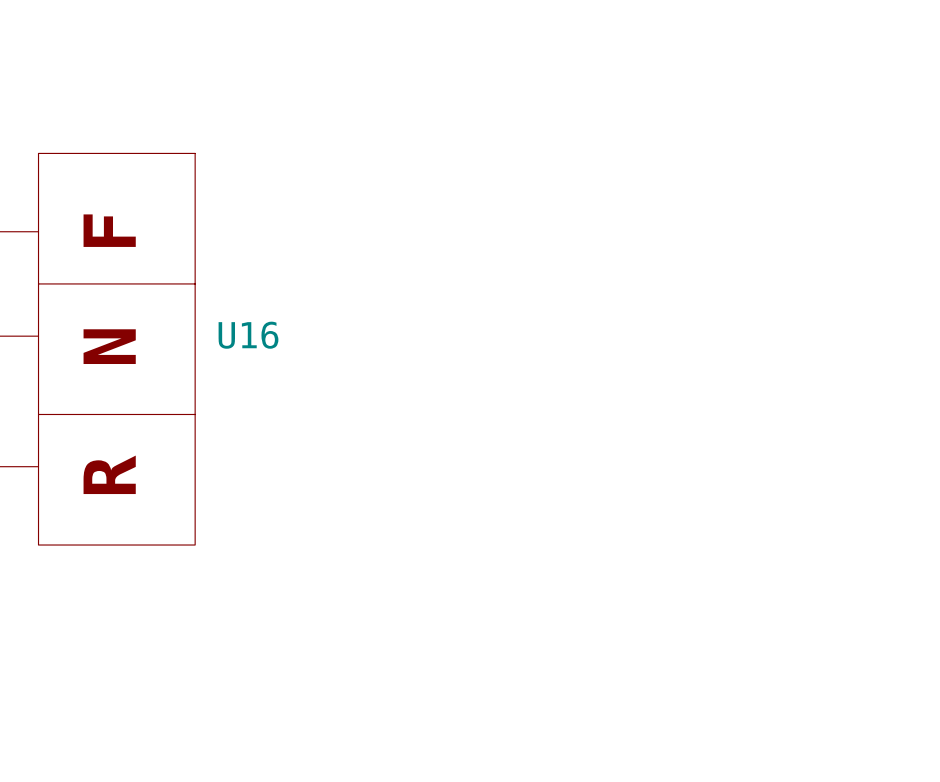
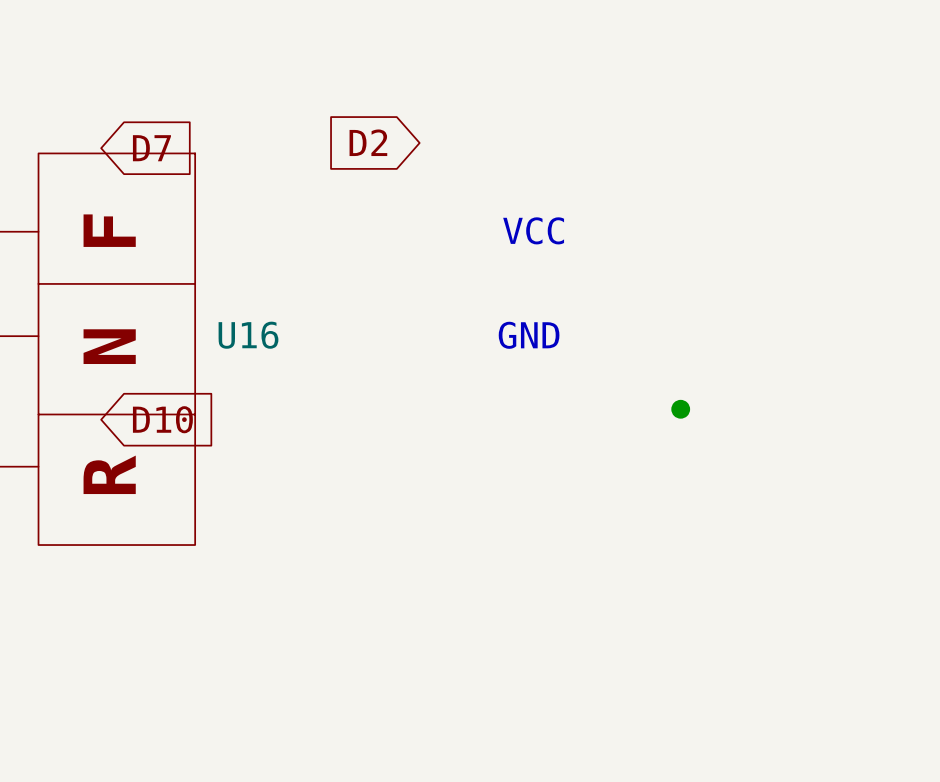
global label: none -> D2 (368, 142)
global label: none -> D7 (151, 148)
text: none -> VCC (533, 230)
text: none -> GND (529, 335)
junction: none -> (680, 409)
global label: none -> D10 (162, 419)

